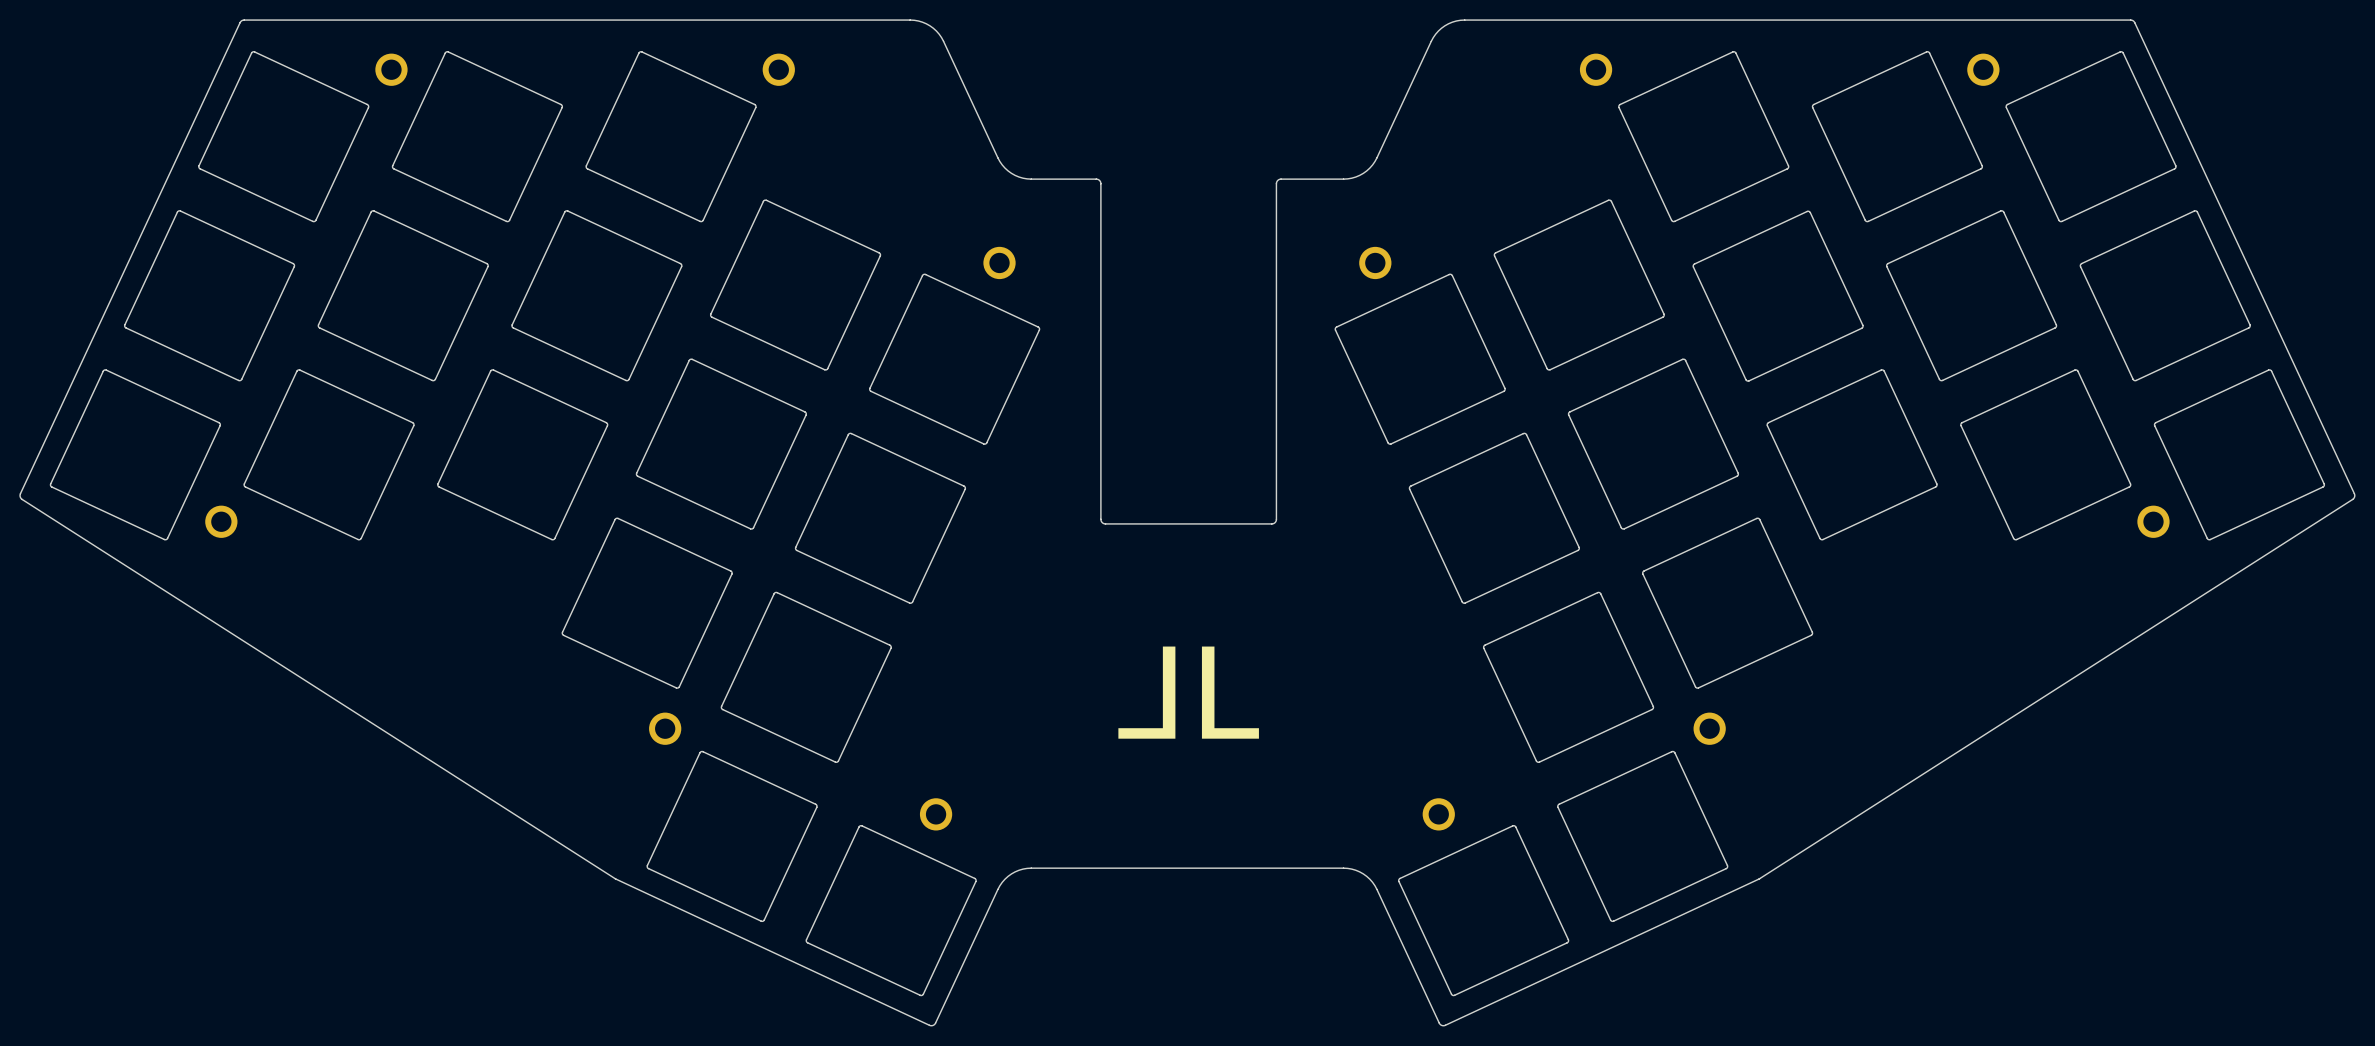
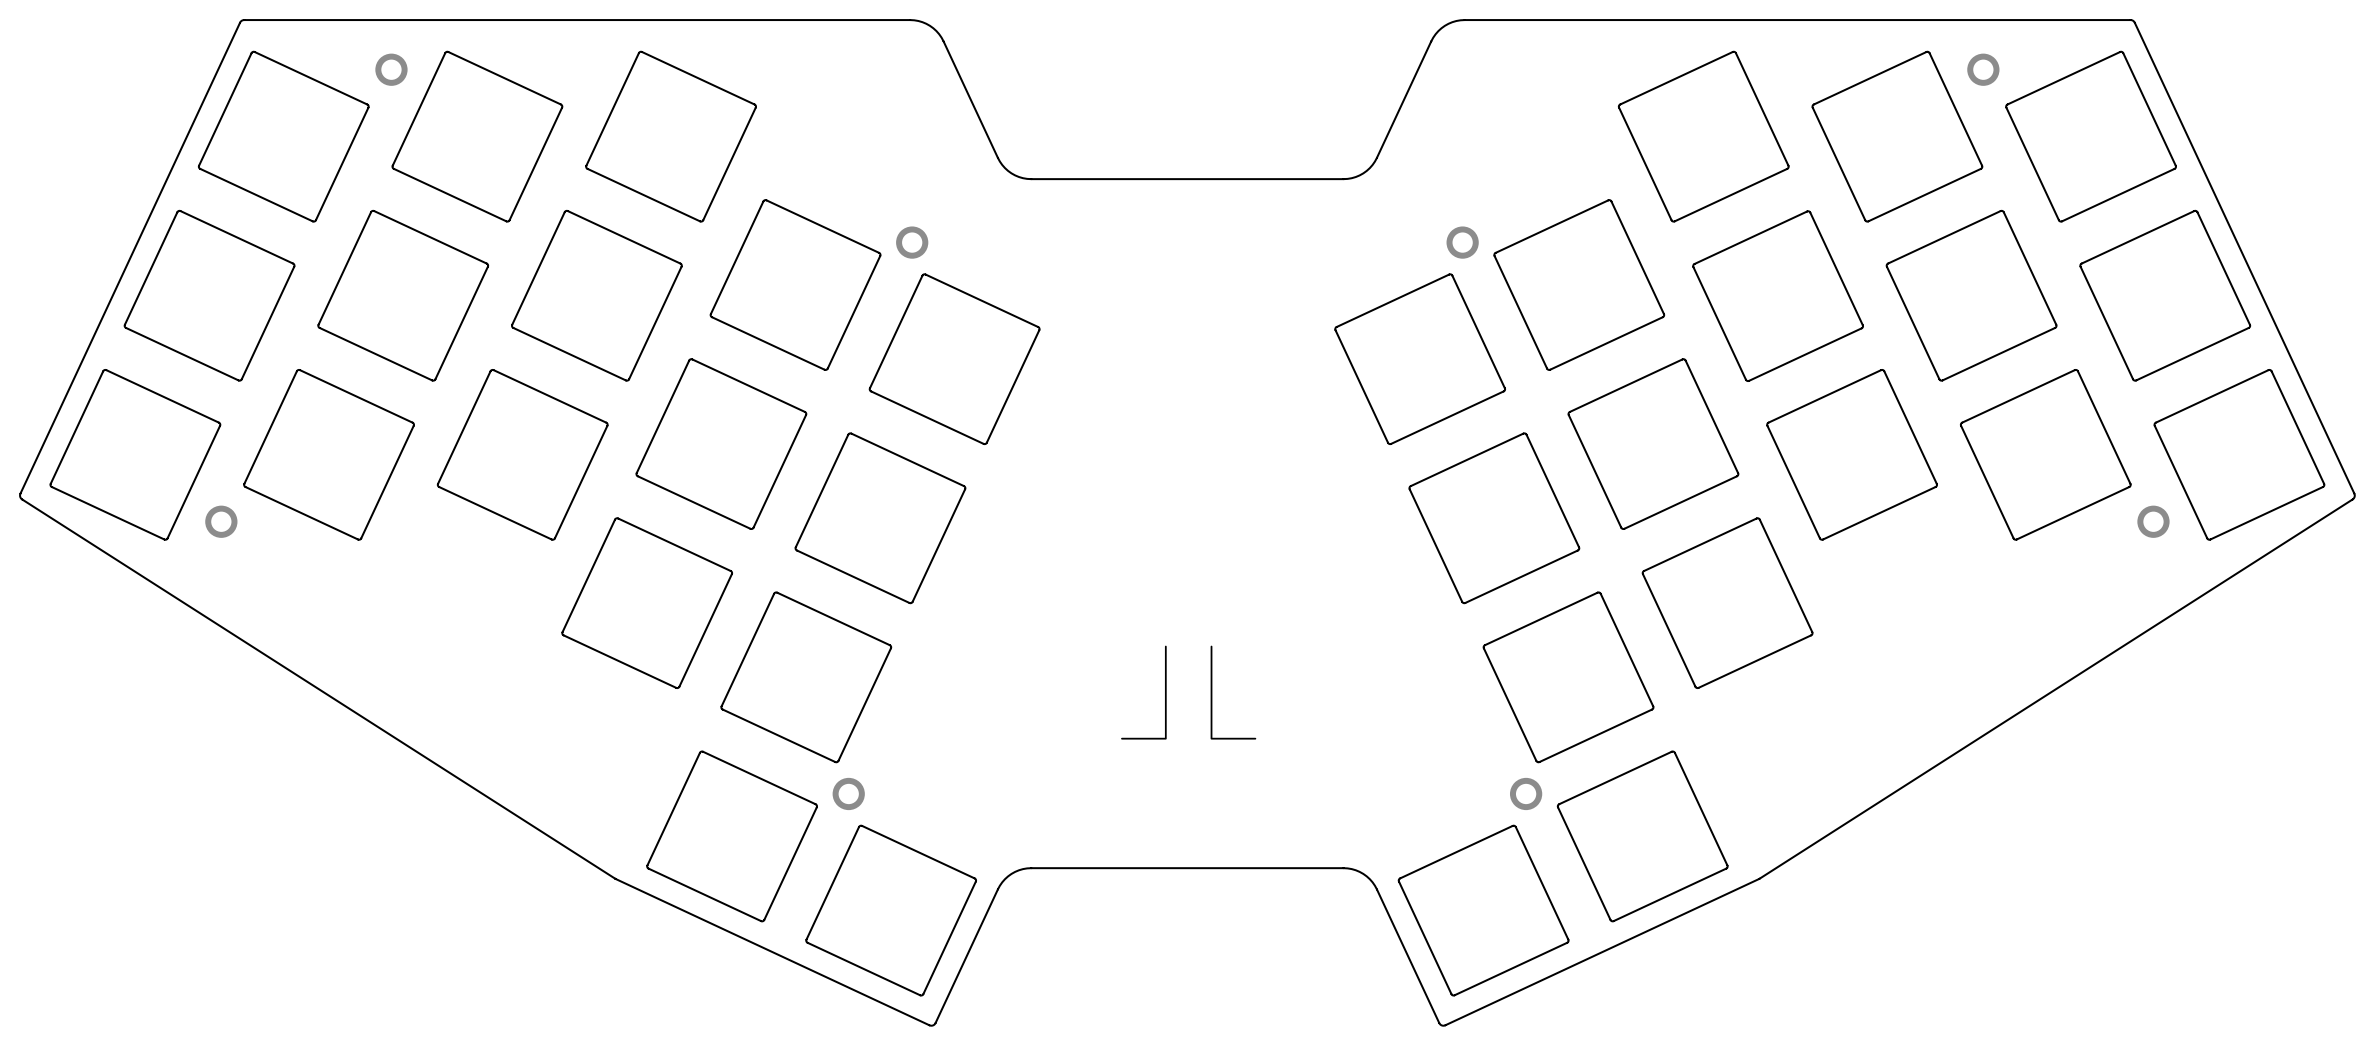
part: (778, 69) -> none
part: (1596, 69) -> none
board edge: (1281, 179) (1276, 183) (1276, 519) (1271, 523) (1105, 523) (1101, 521) (1100, 183) (1096, 179) -> (1281, 179) (1096, 179)
part position: (999, 262) -> (912, 242)
part position: (1375, 262) -> (1462, 242)
part: (665, 728) -> none
part: (1709, 728) -> none
part position: (936, 814) -> (848, 793)
part position: (1438, 814) -> (1526, 793)

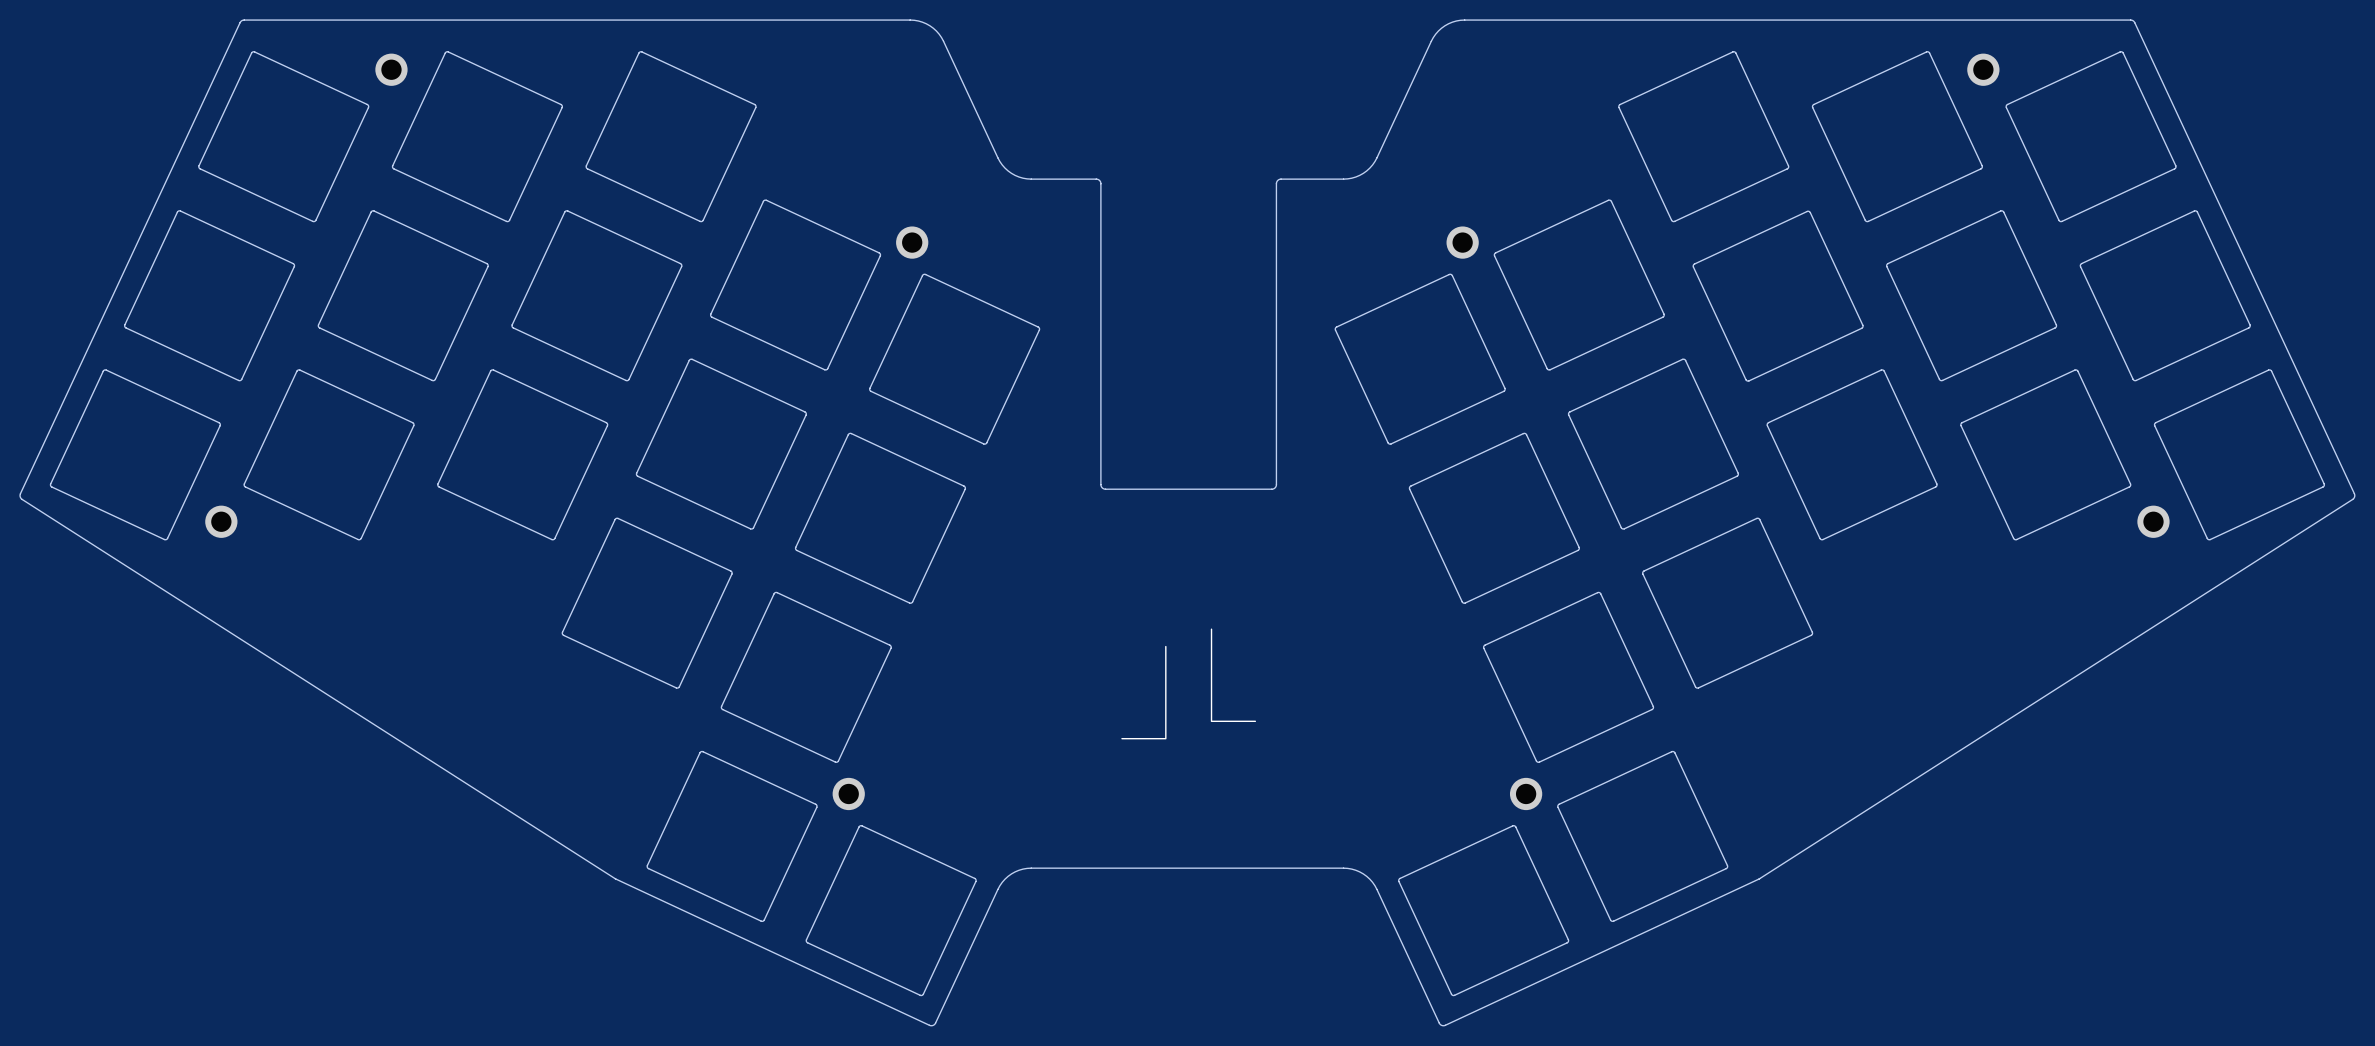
board edge: (1281, 179) (1096, 179) -> (1281, 179) (1276, 183) (1276, 484) (1271, 489) (1105, 489) (1101, 486) (1100, 183) (1096, 179)
text position: L (1233, 692) -> L (1233, 675)

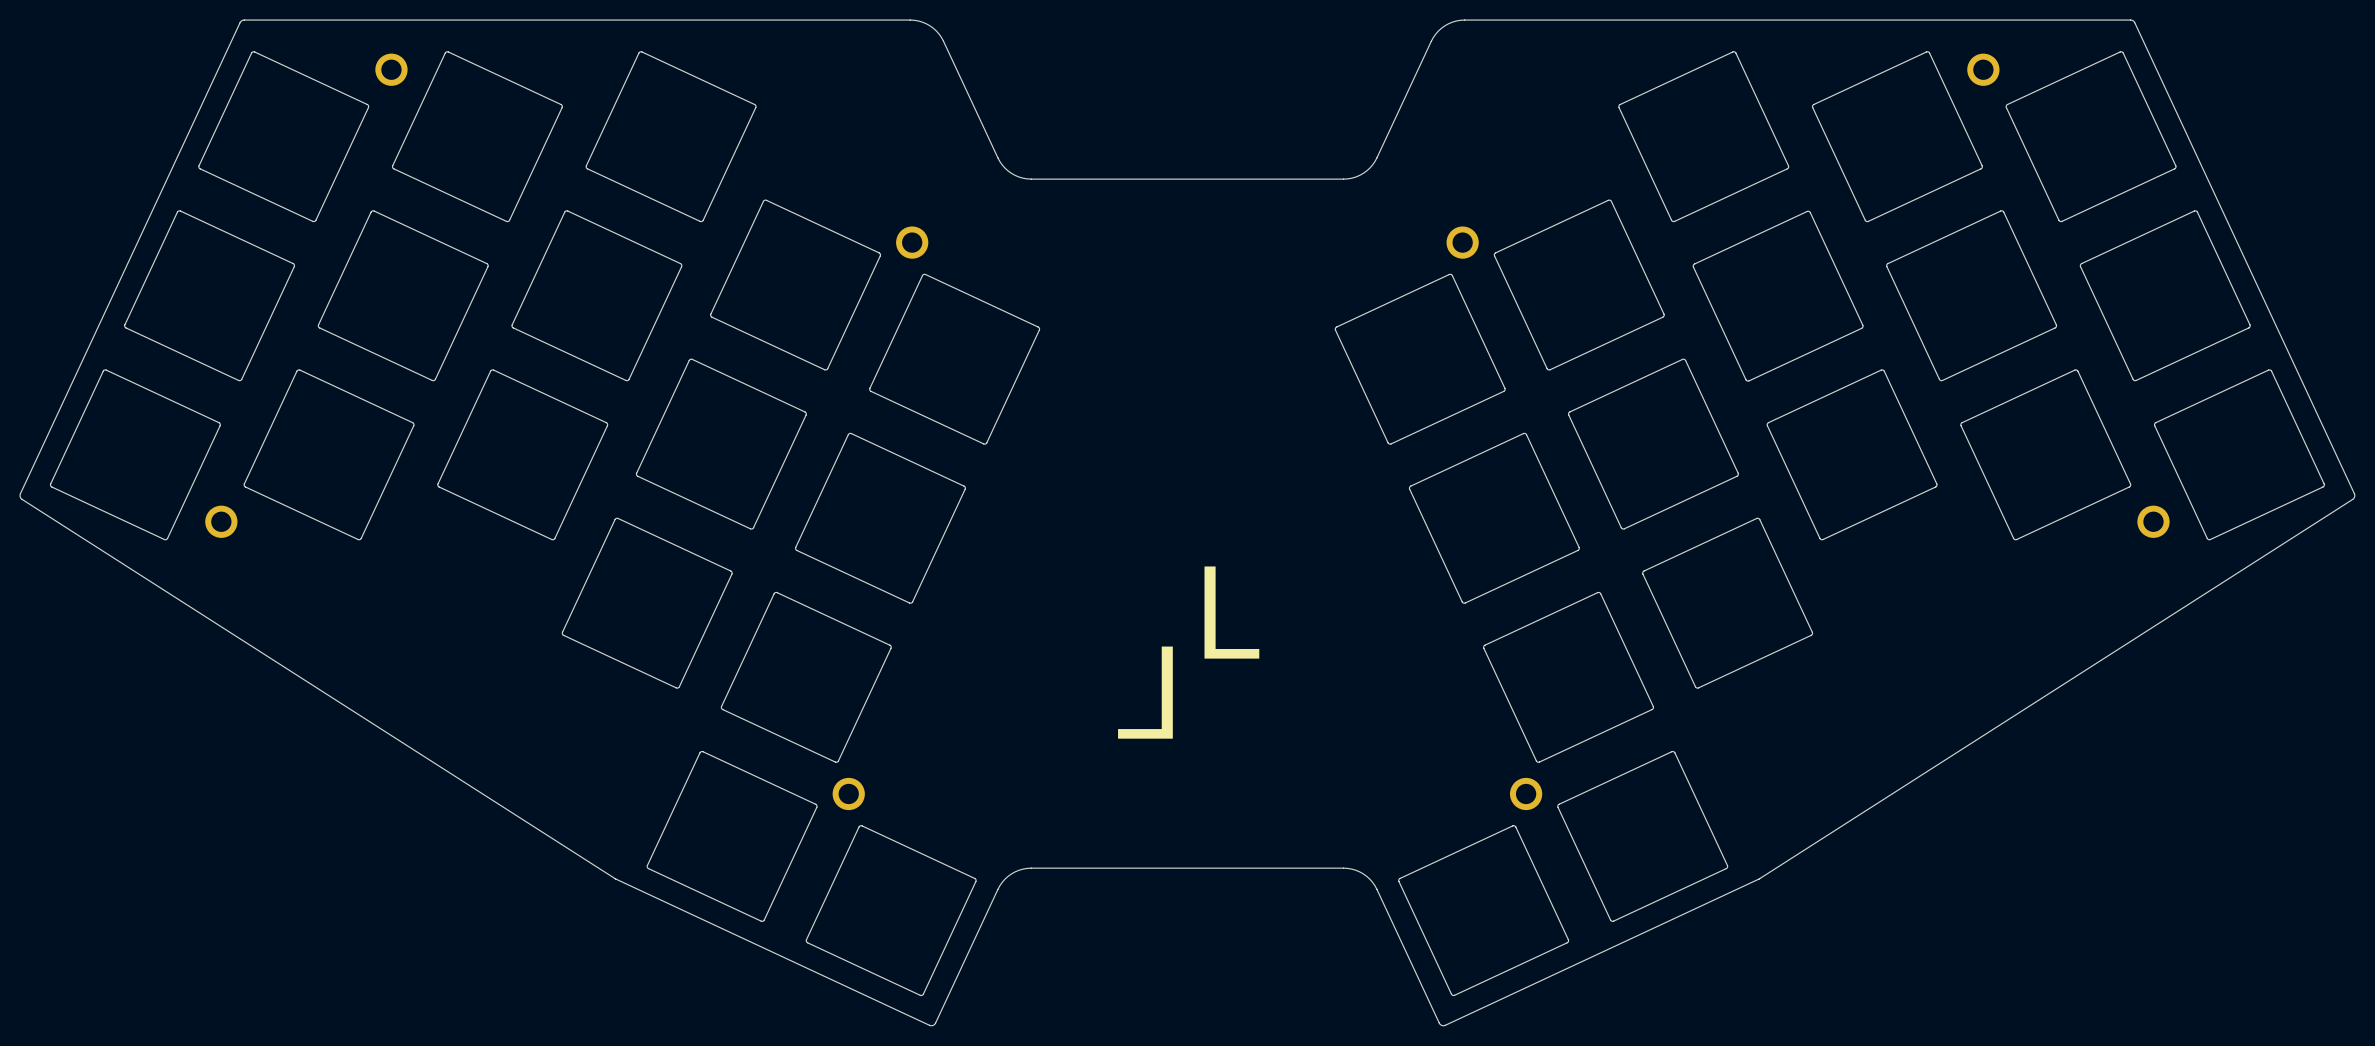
board edge: (1281, 179) (1276, 183) (1276, 484) (1271, 489) (1105, 489) (1101, 486) (1100, 183) (1096, 179) -> (1281, 179) (1096, 179)
text position: L (1233, 675) -> L (1231, 612)

